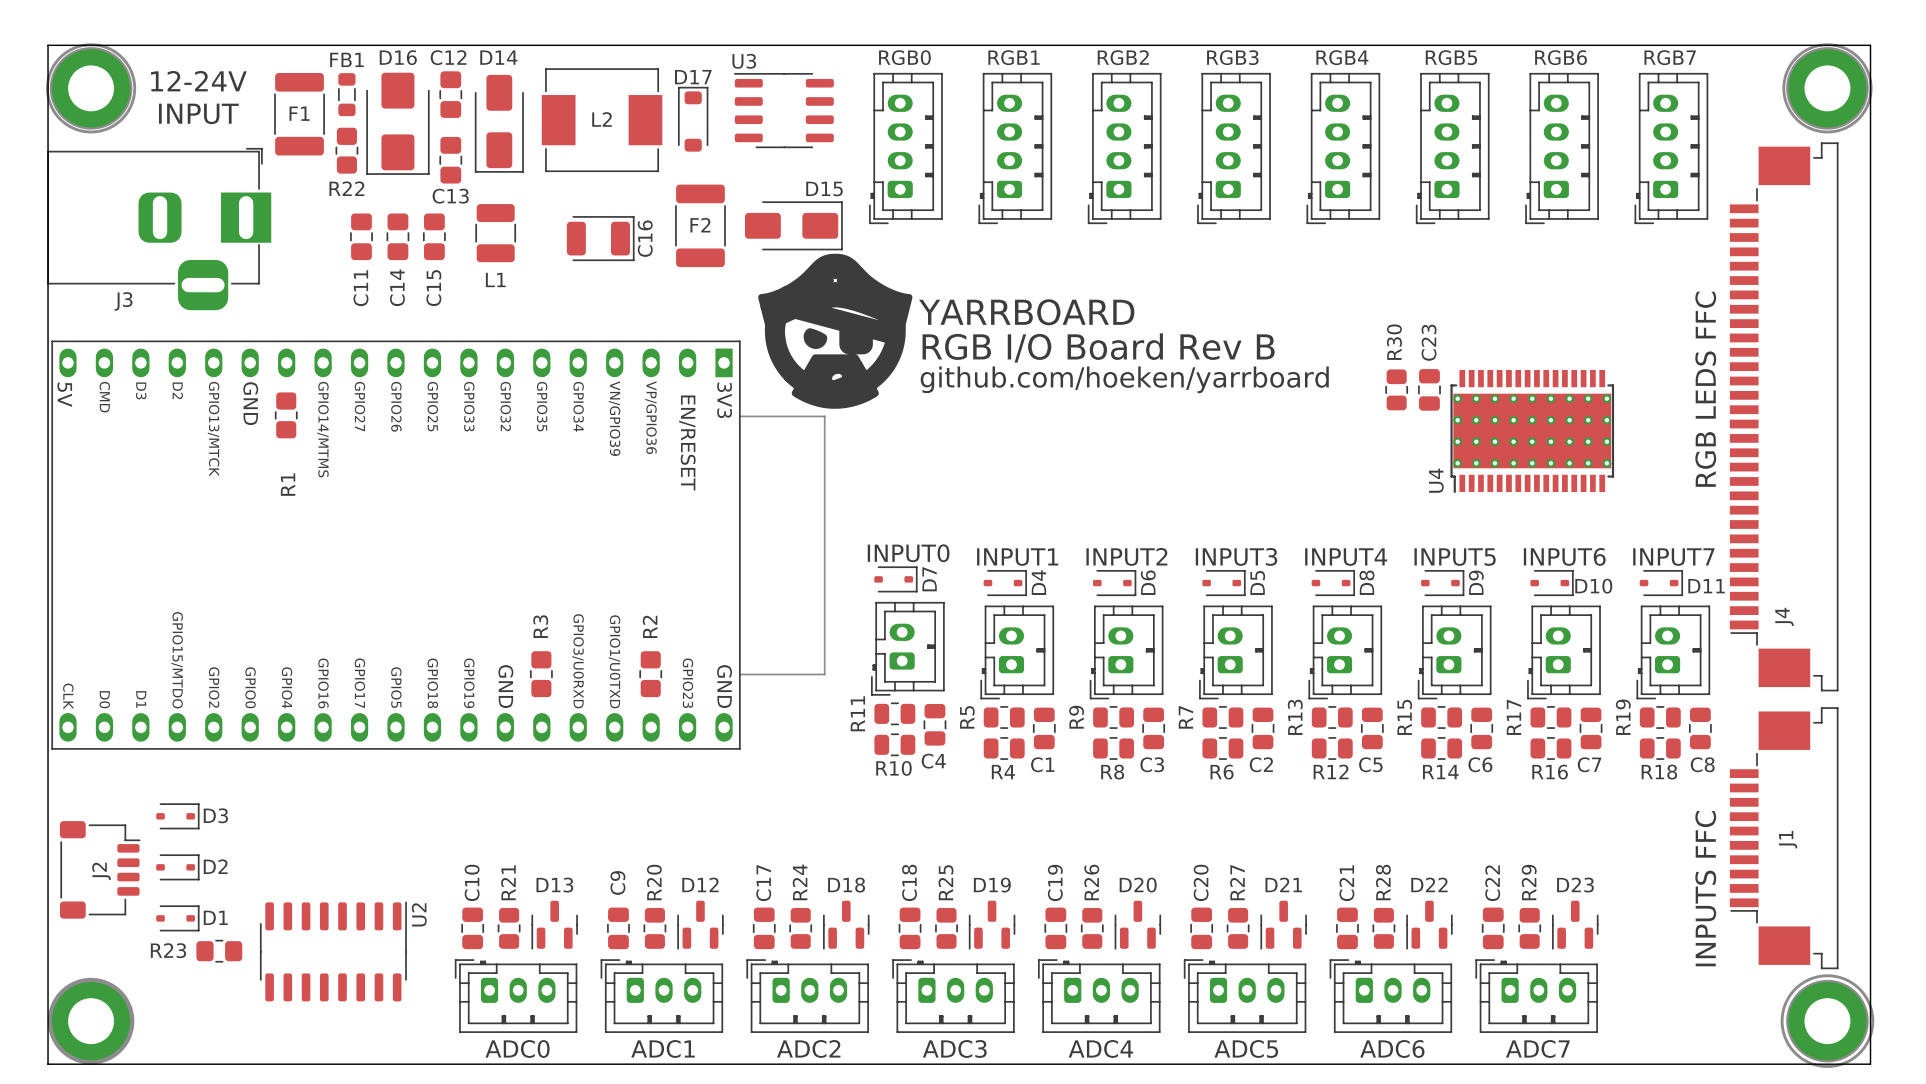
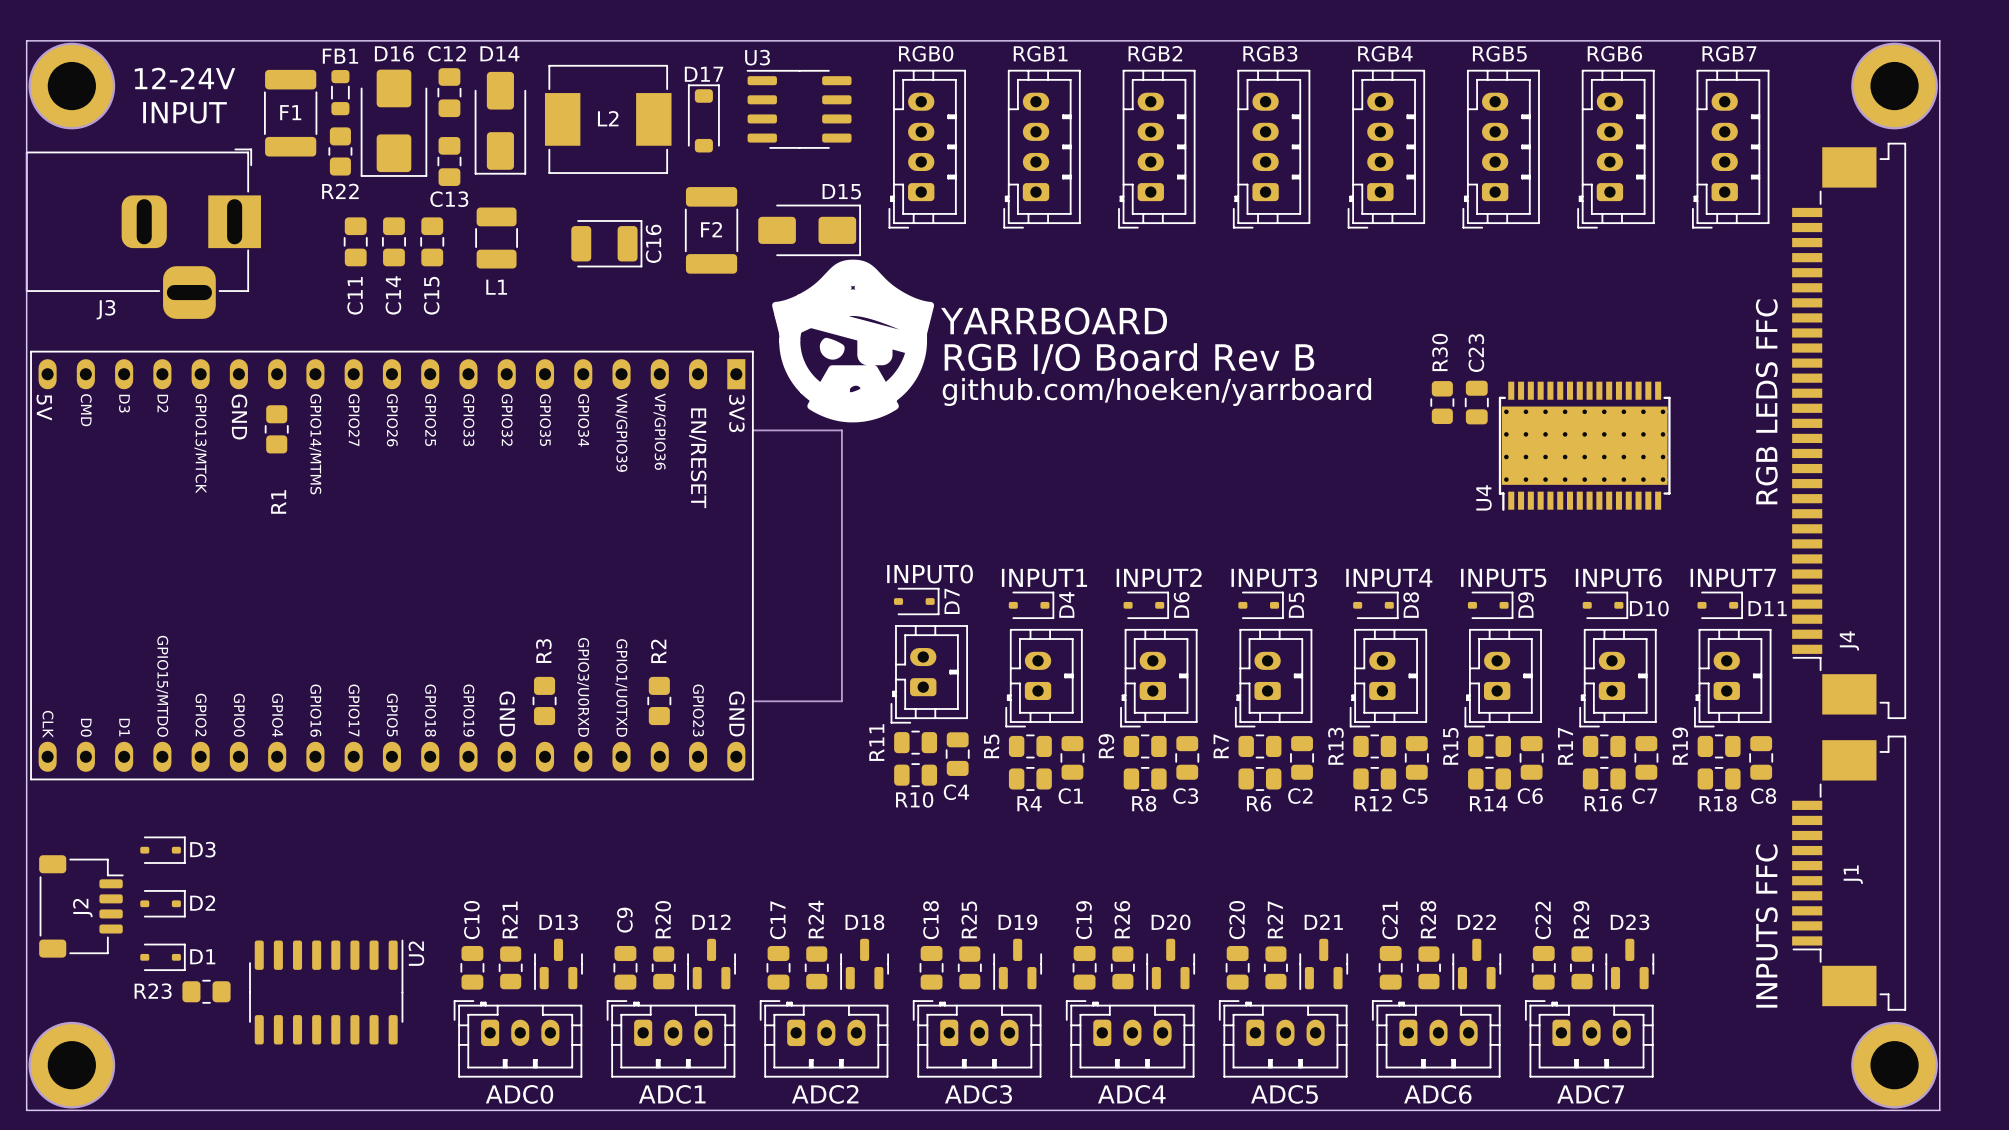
drawing: [45, 43, 137, 134] -> none
drawing: [1782, 43, 1873, 134] -> none
drawing: [1780, 974, 1875, 1068] -> none
drawing: [47, 977, 135, 1065] -> none

